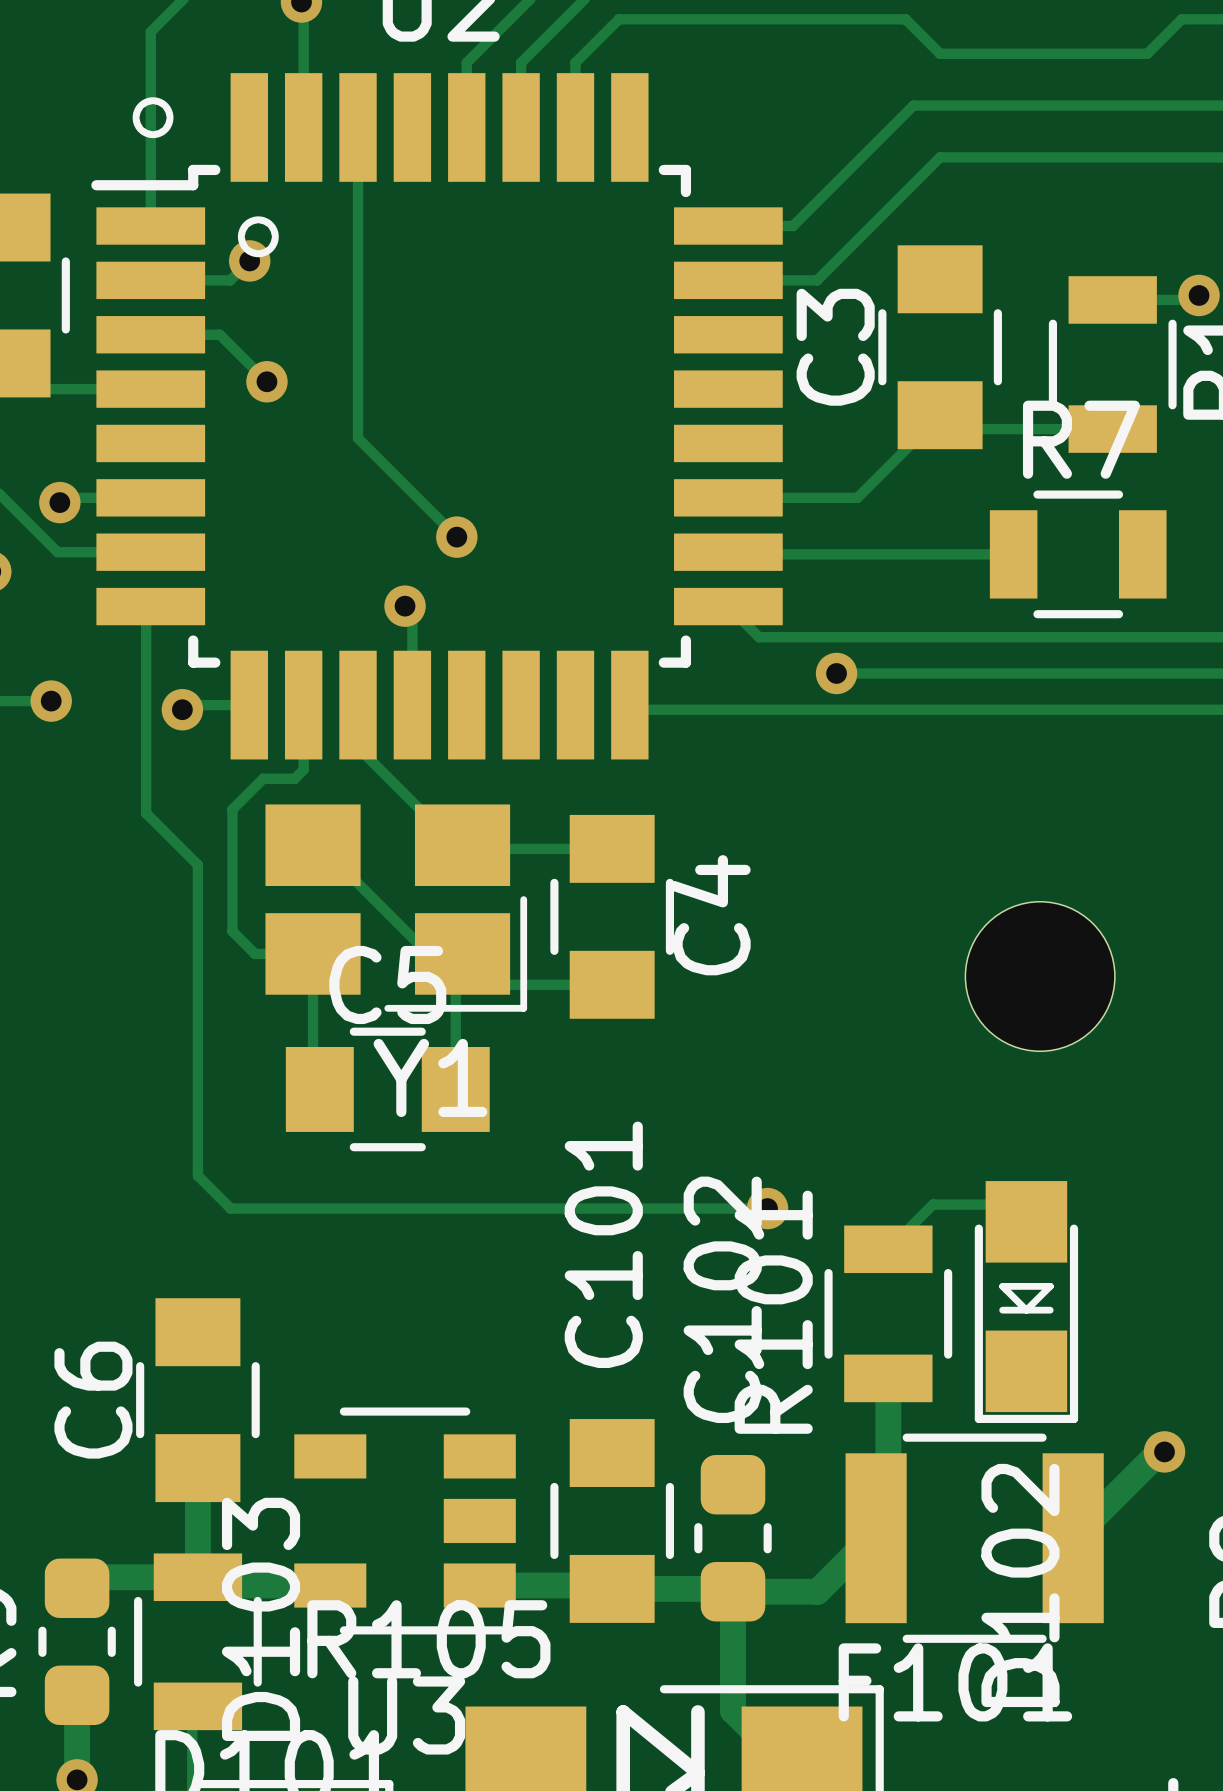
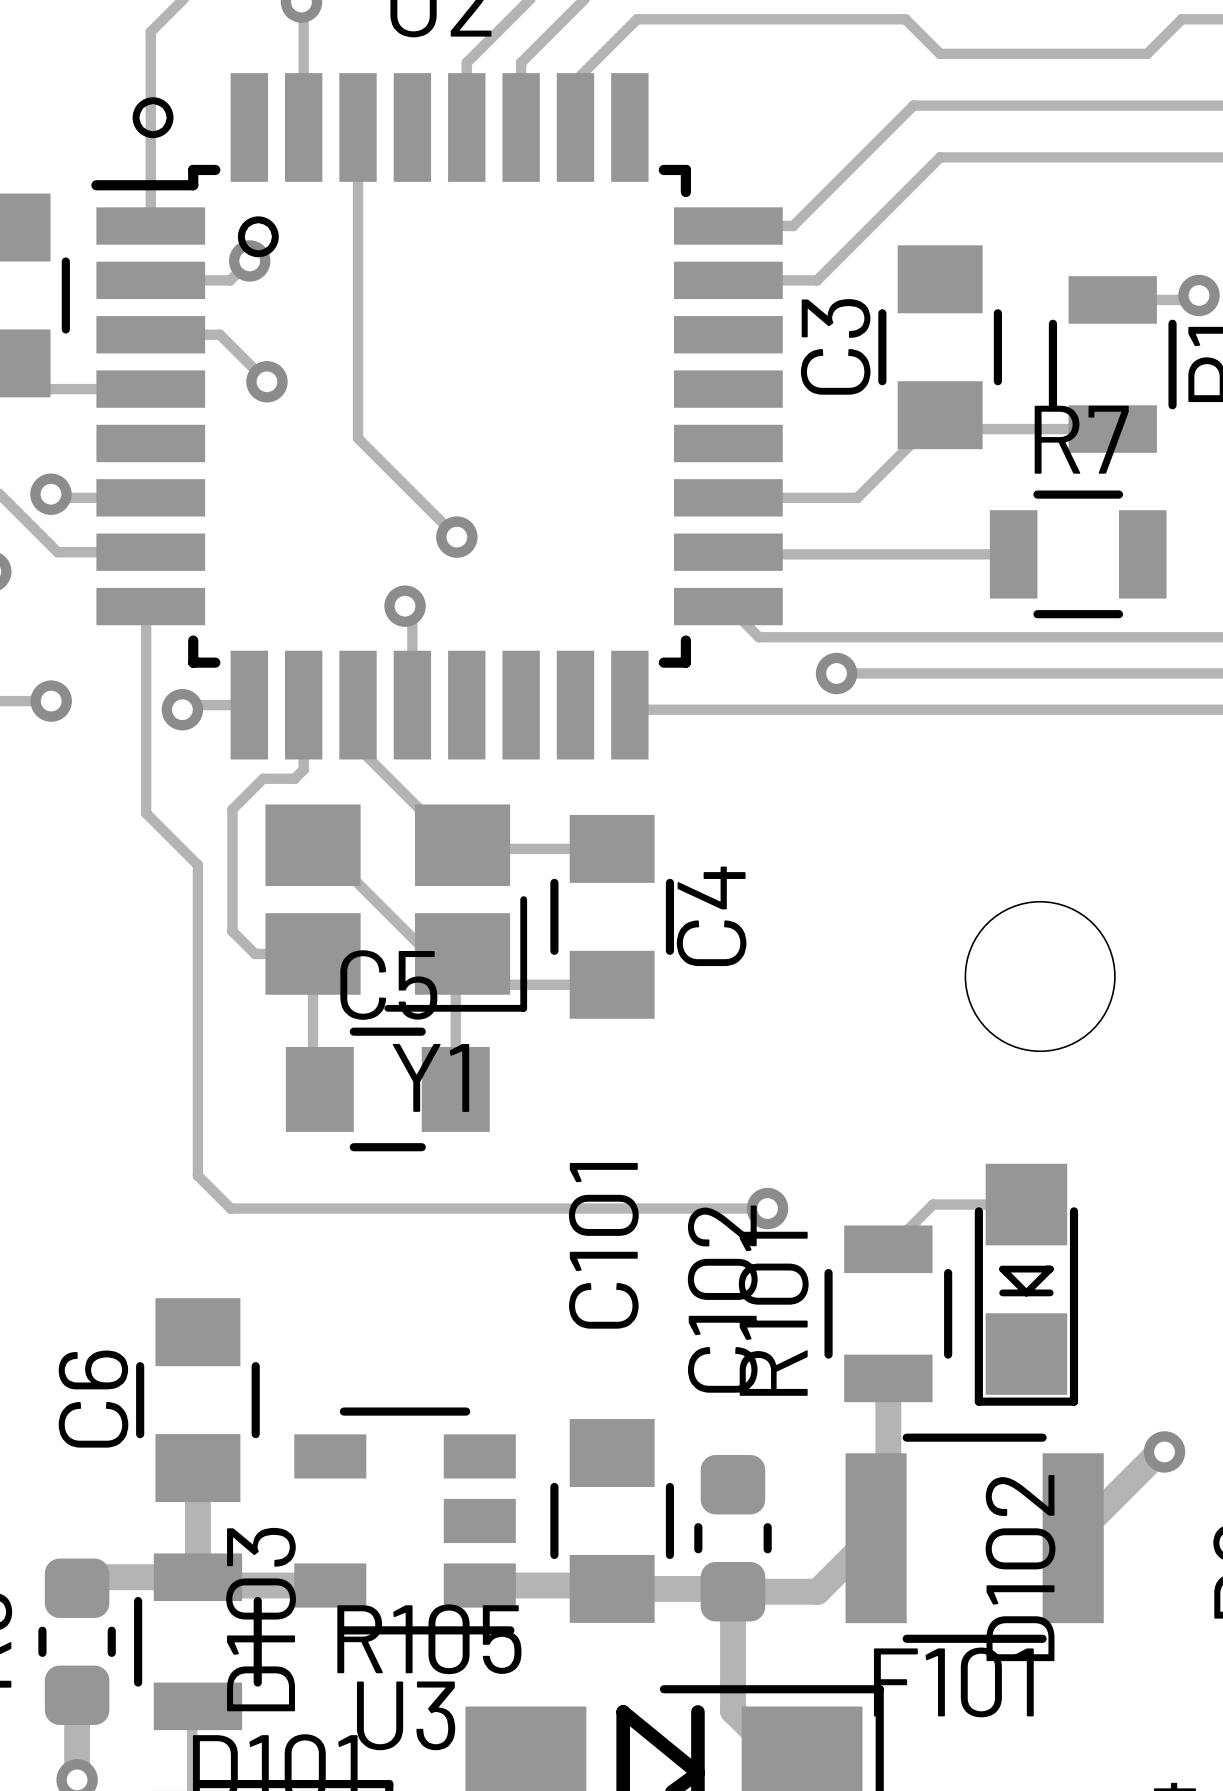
track: (637, 19) (618, 19) (575, 62) (575, 80) -> (637, 19) (575, 80)
via position: (59, 502) -> (50, 494)
D102 position: (1026, 1302) -> (1026, 1284)

